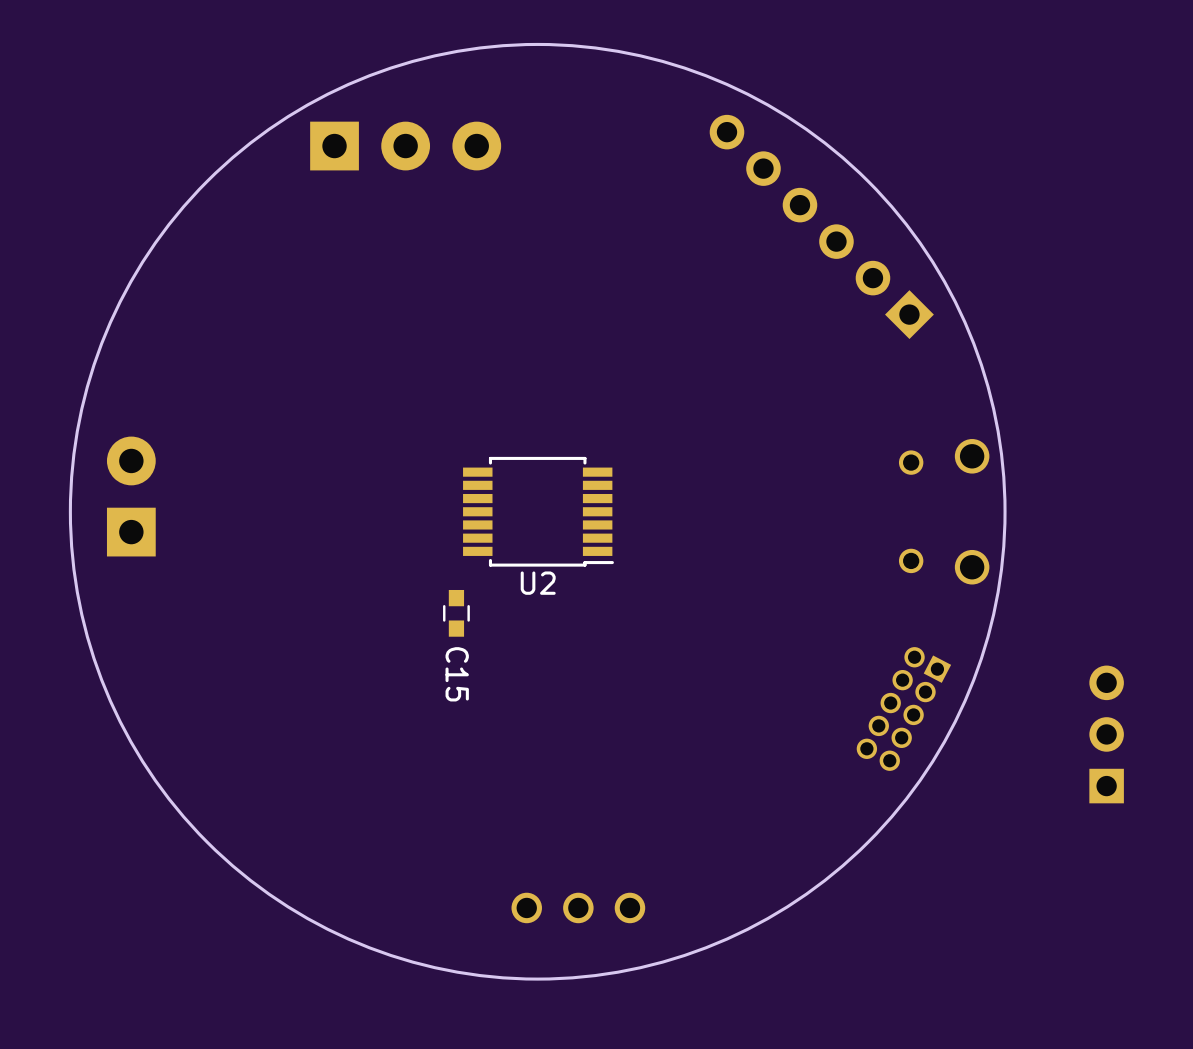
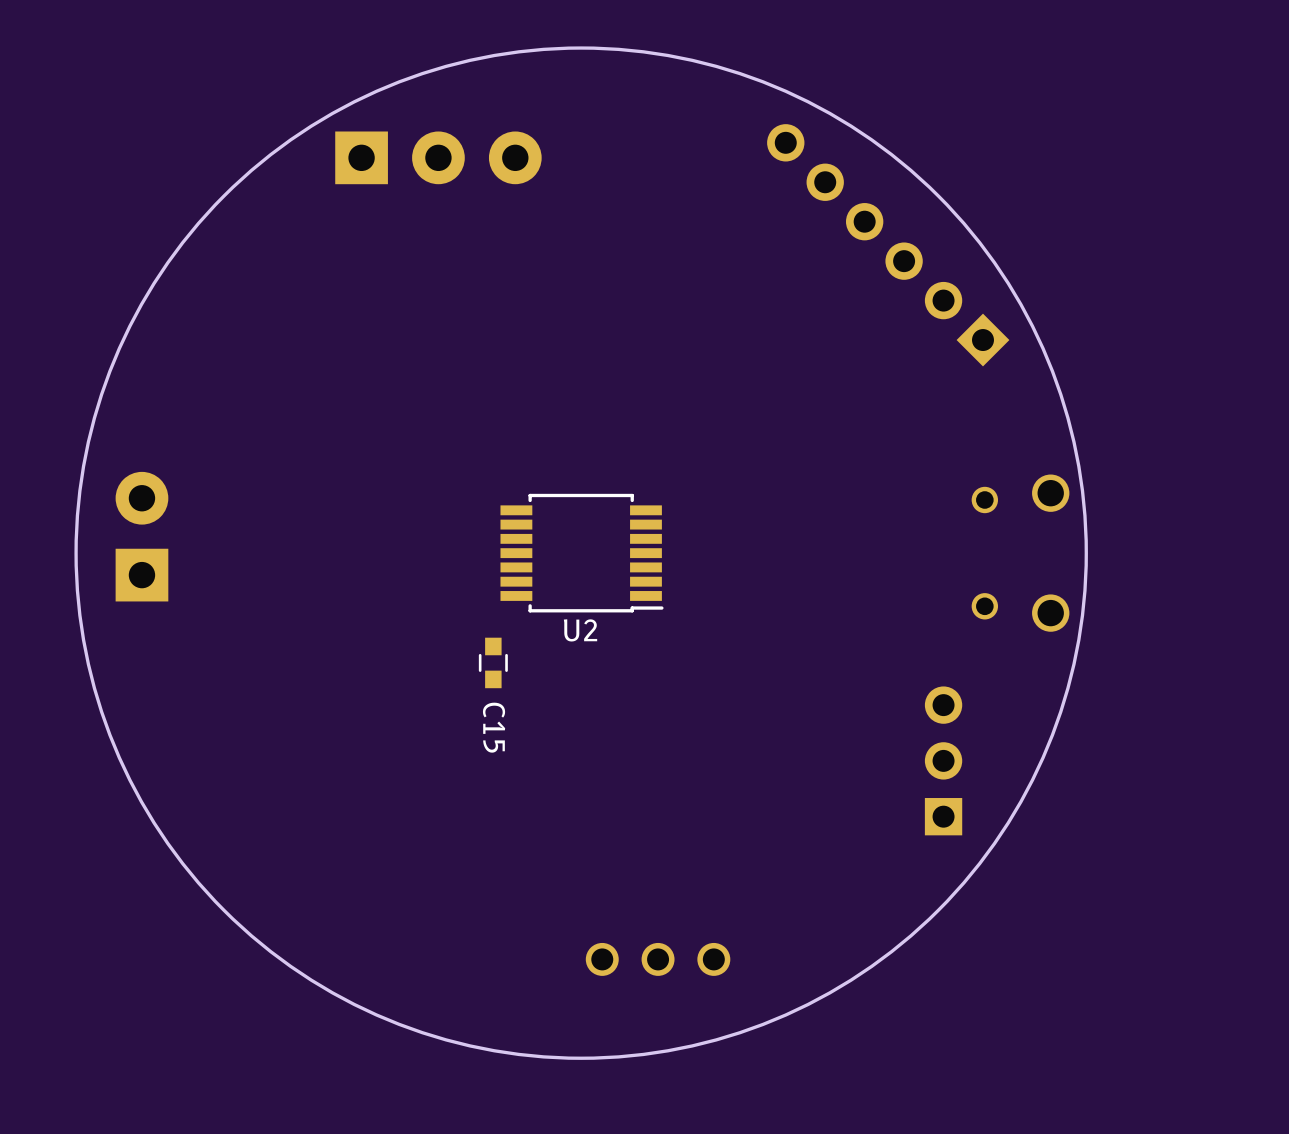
part: (903, 708) -> none
part position: (1106, 734) -> (943, 760)
part position: (578, 907) -> (658, 959)

